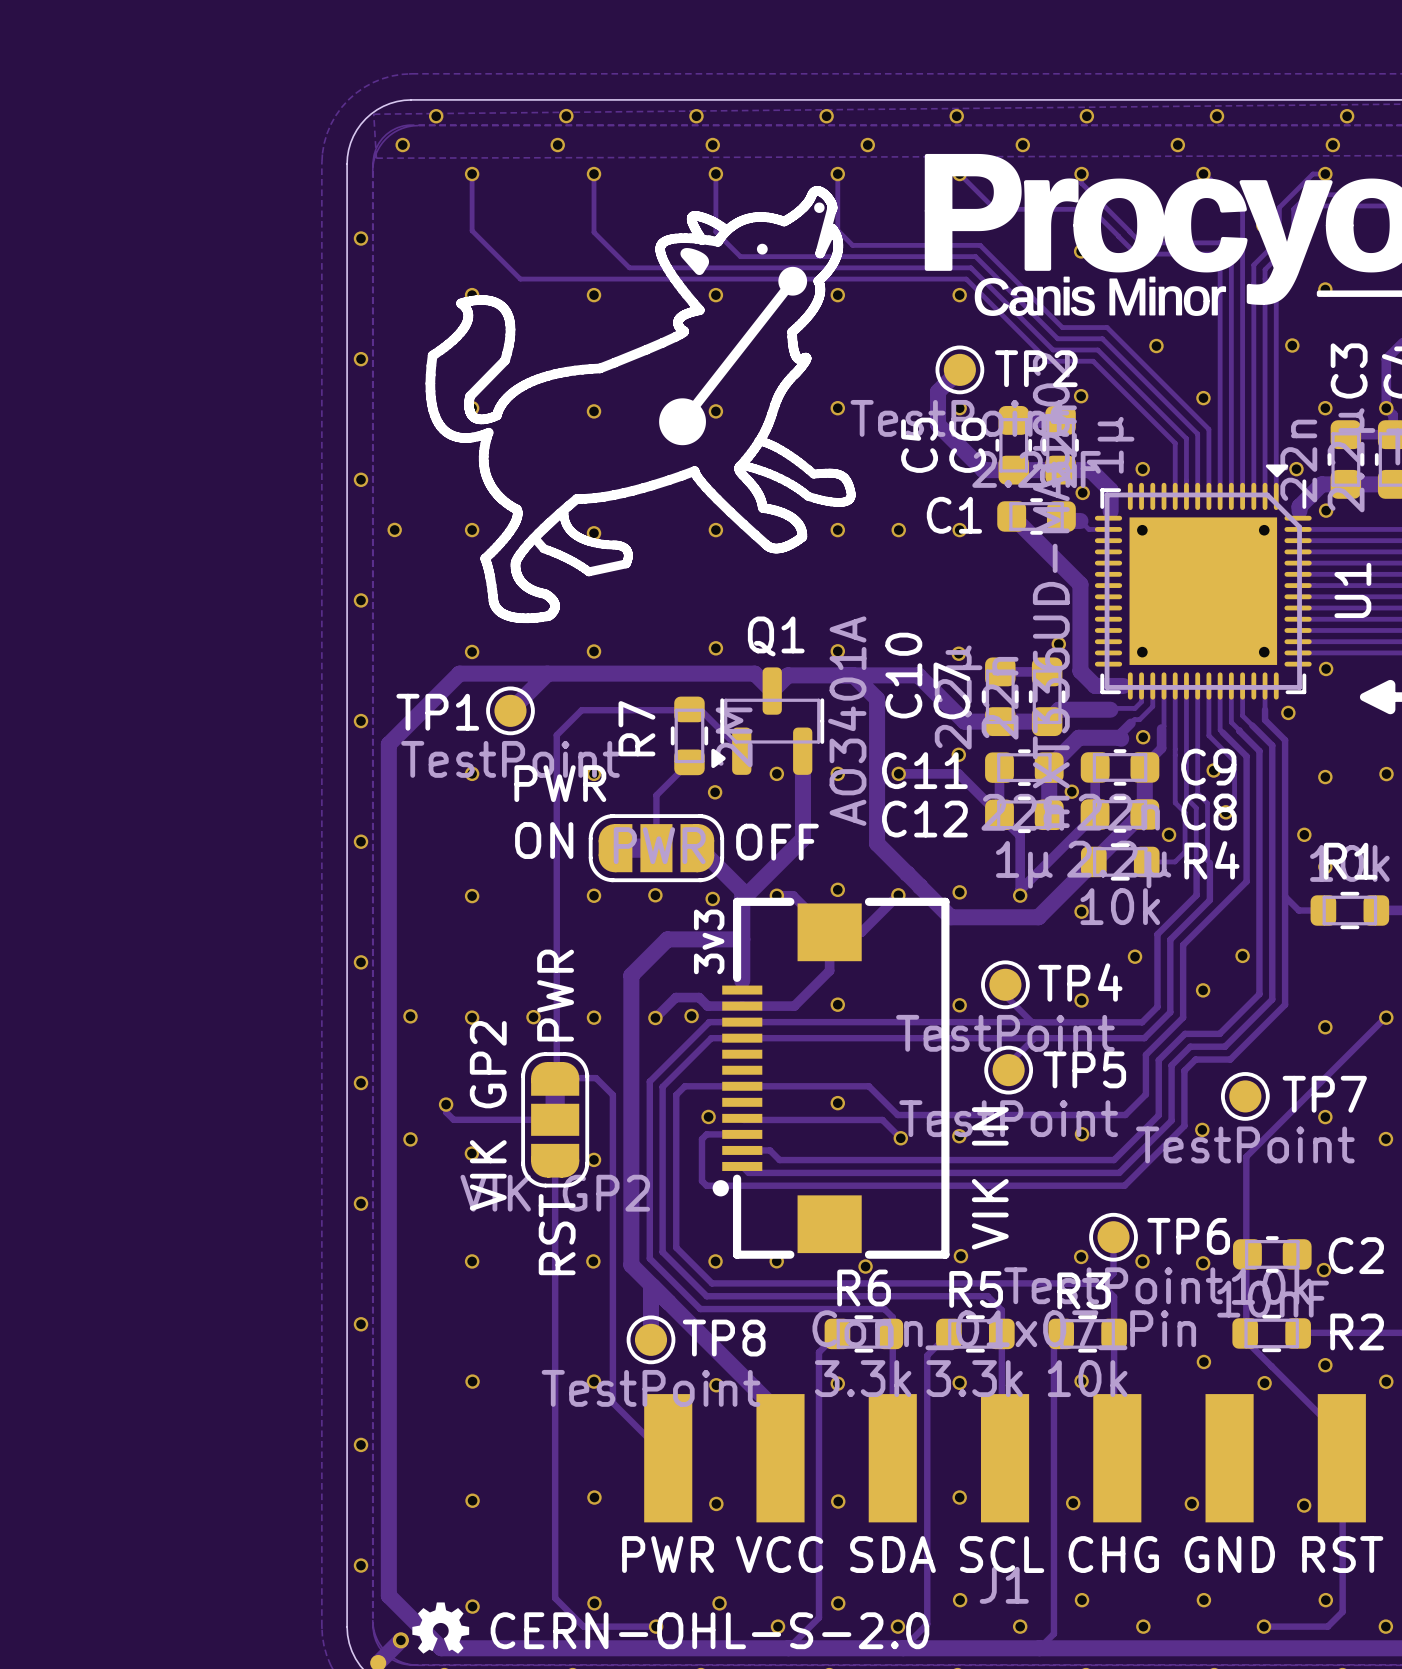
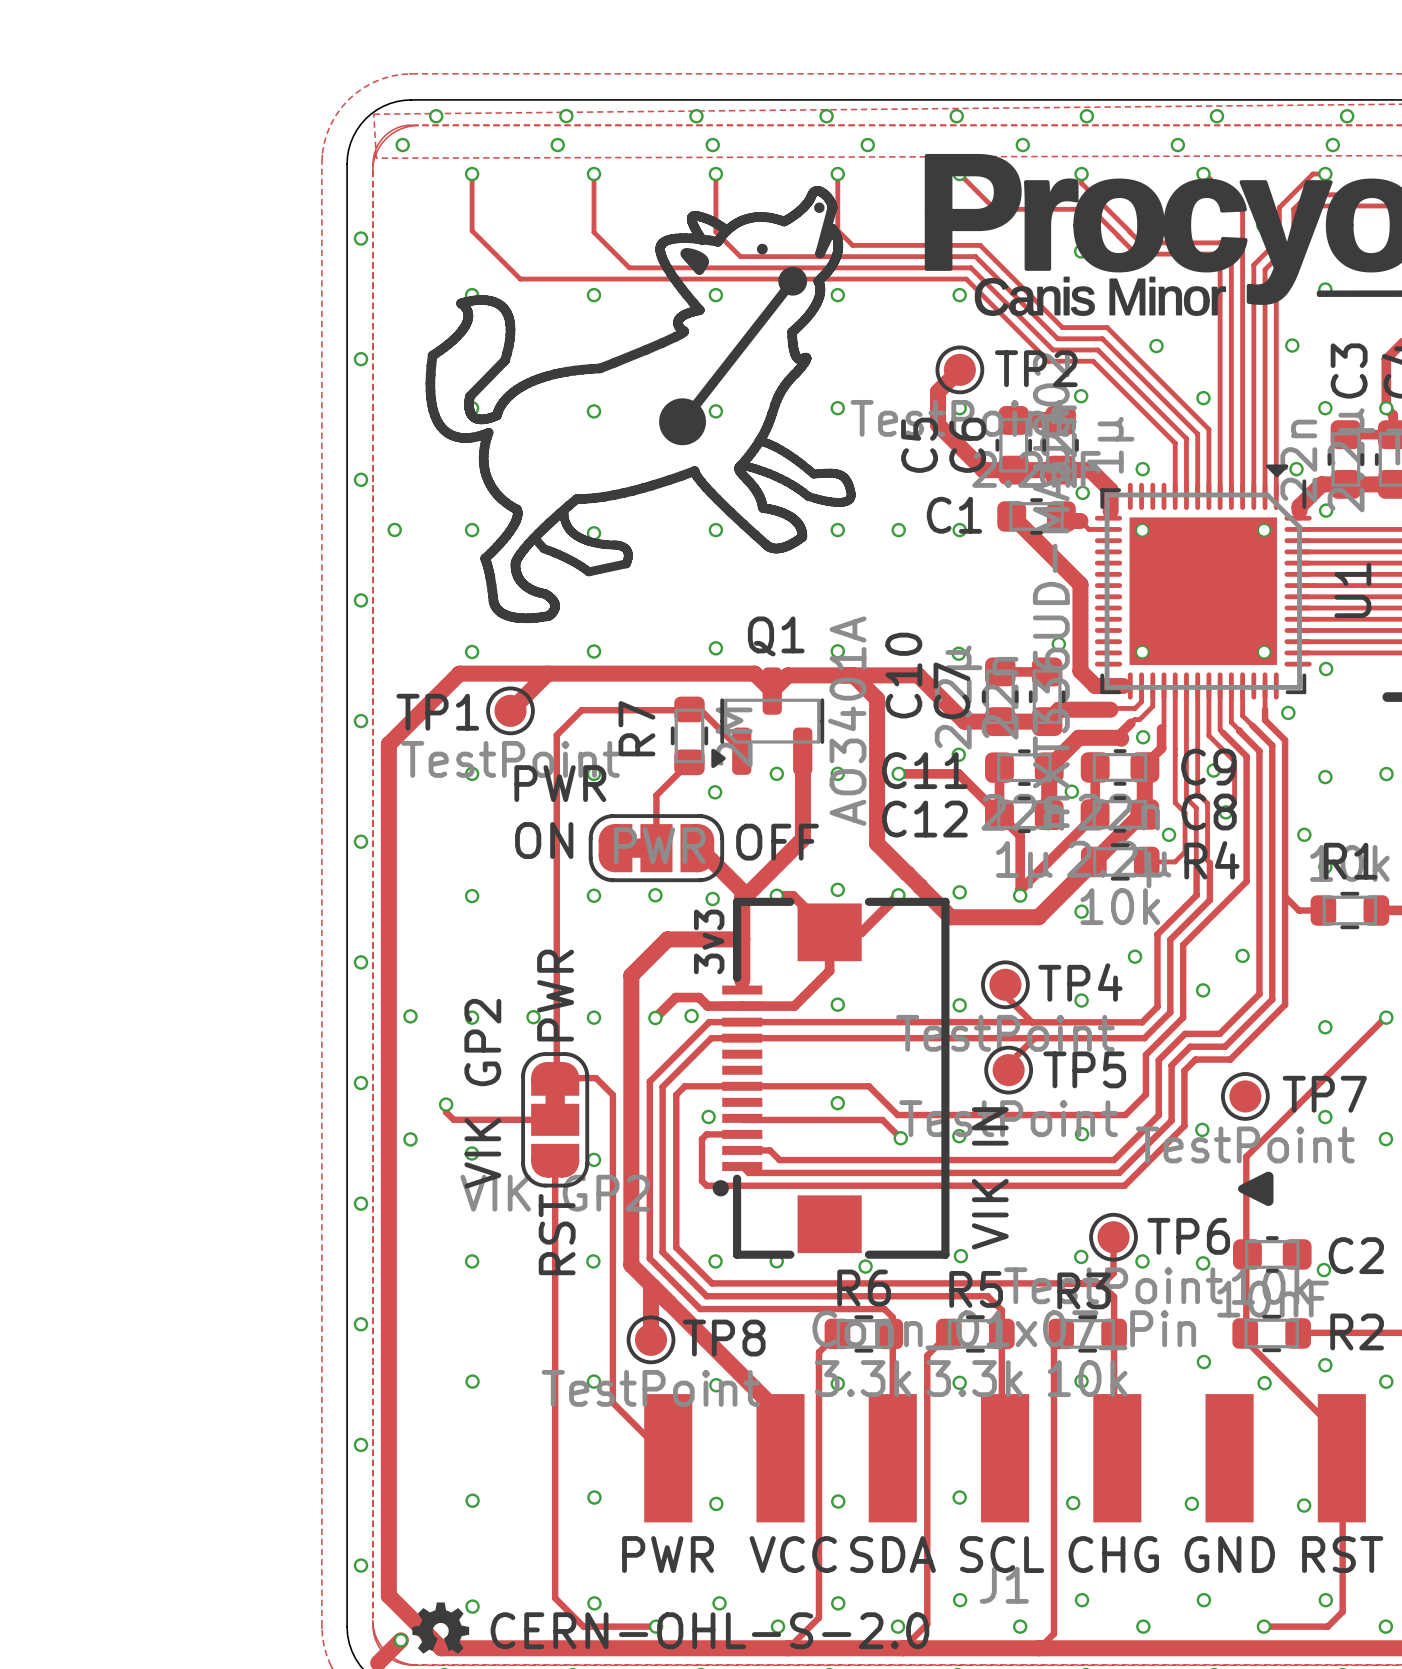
drawing position: (1377, 697) -> (1255, 1188)
text position: VIK GP2 (488, 1115) -> VIK GP2 (482, 1093)
text position: VCC (779, 1554) -> VCC (793, 1554)

